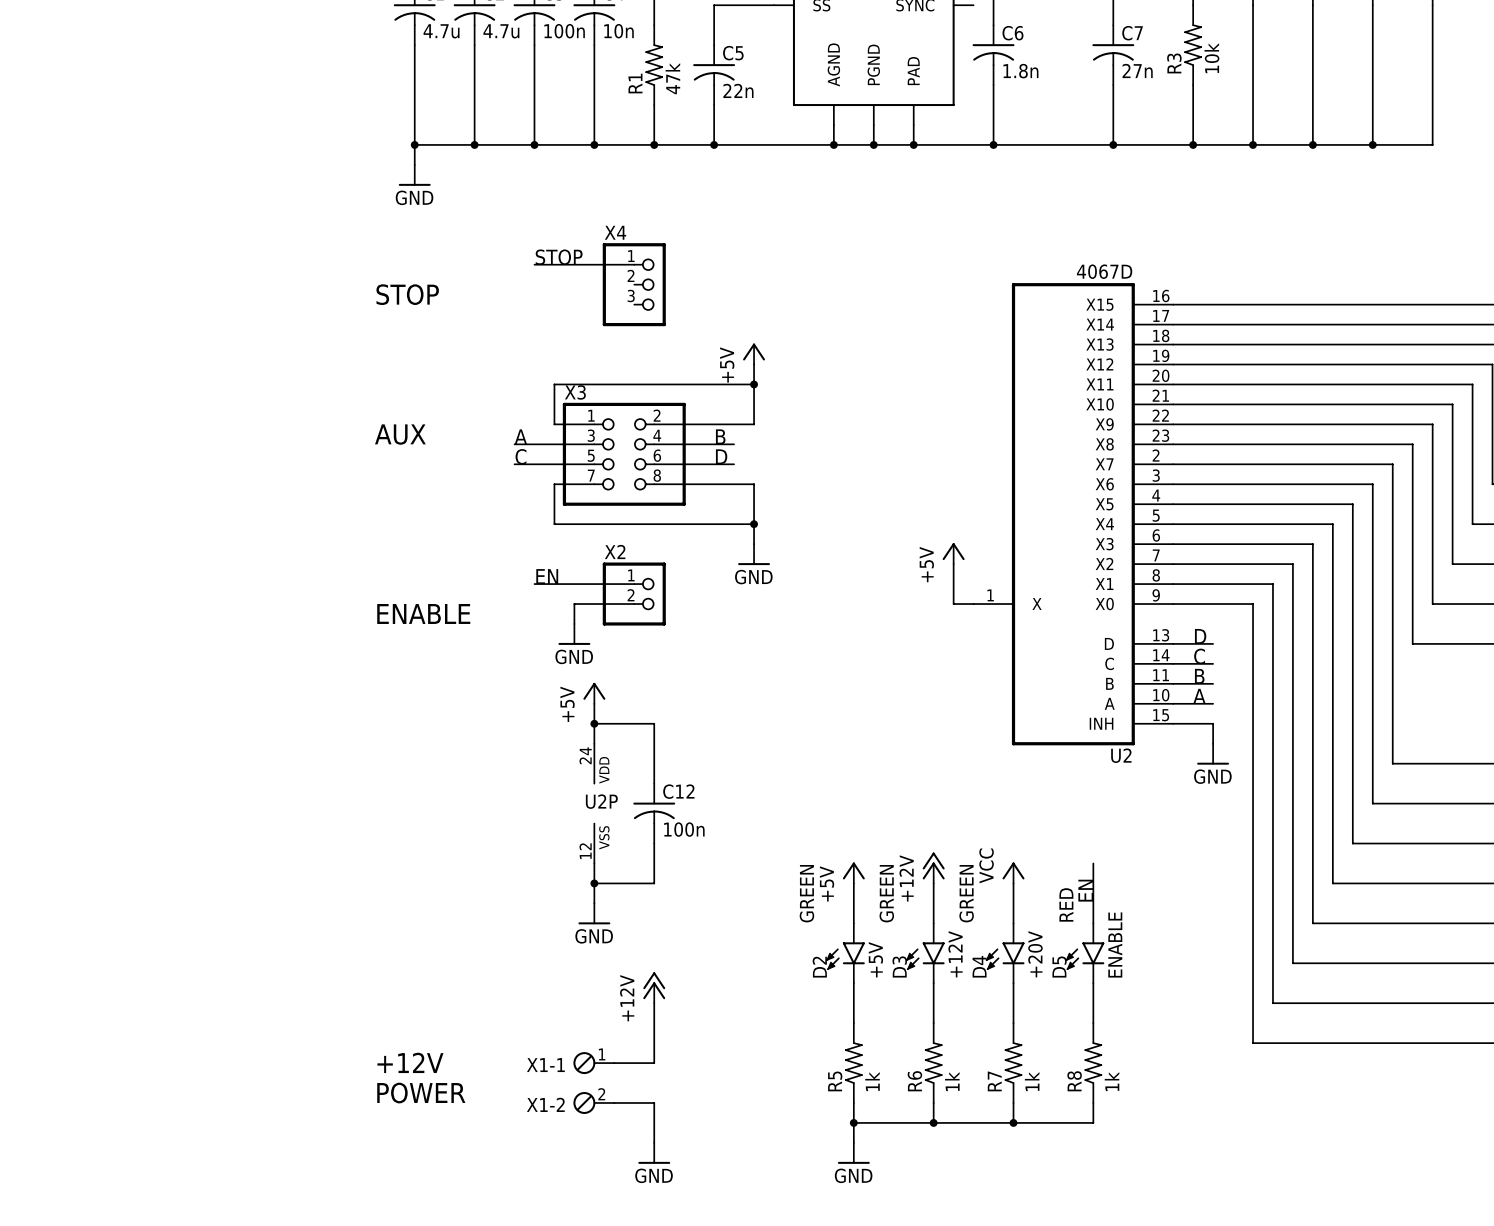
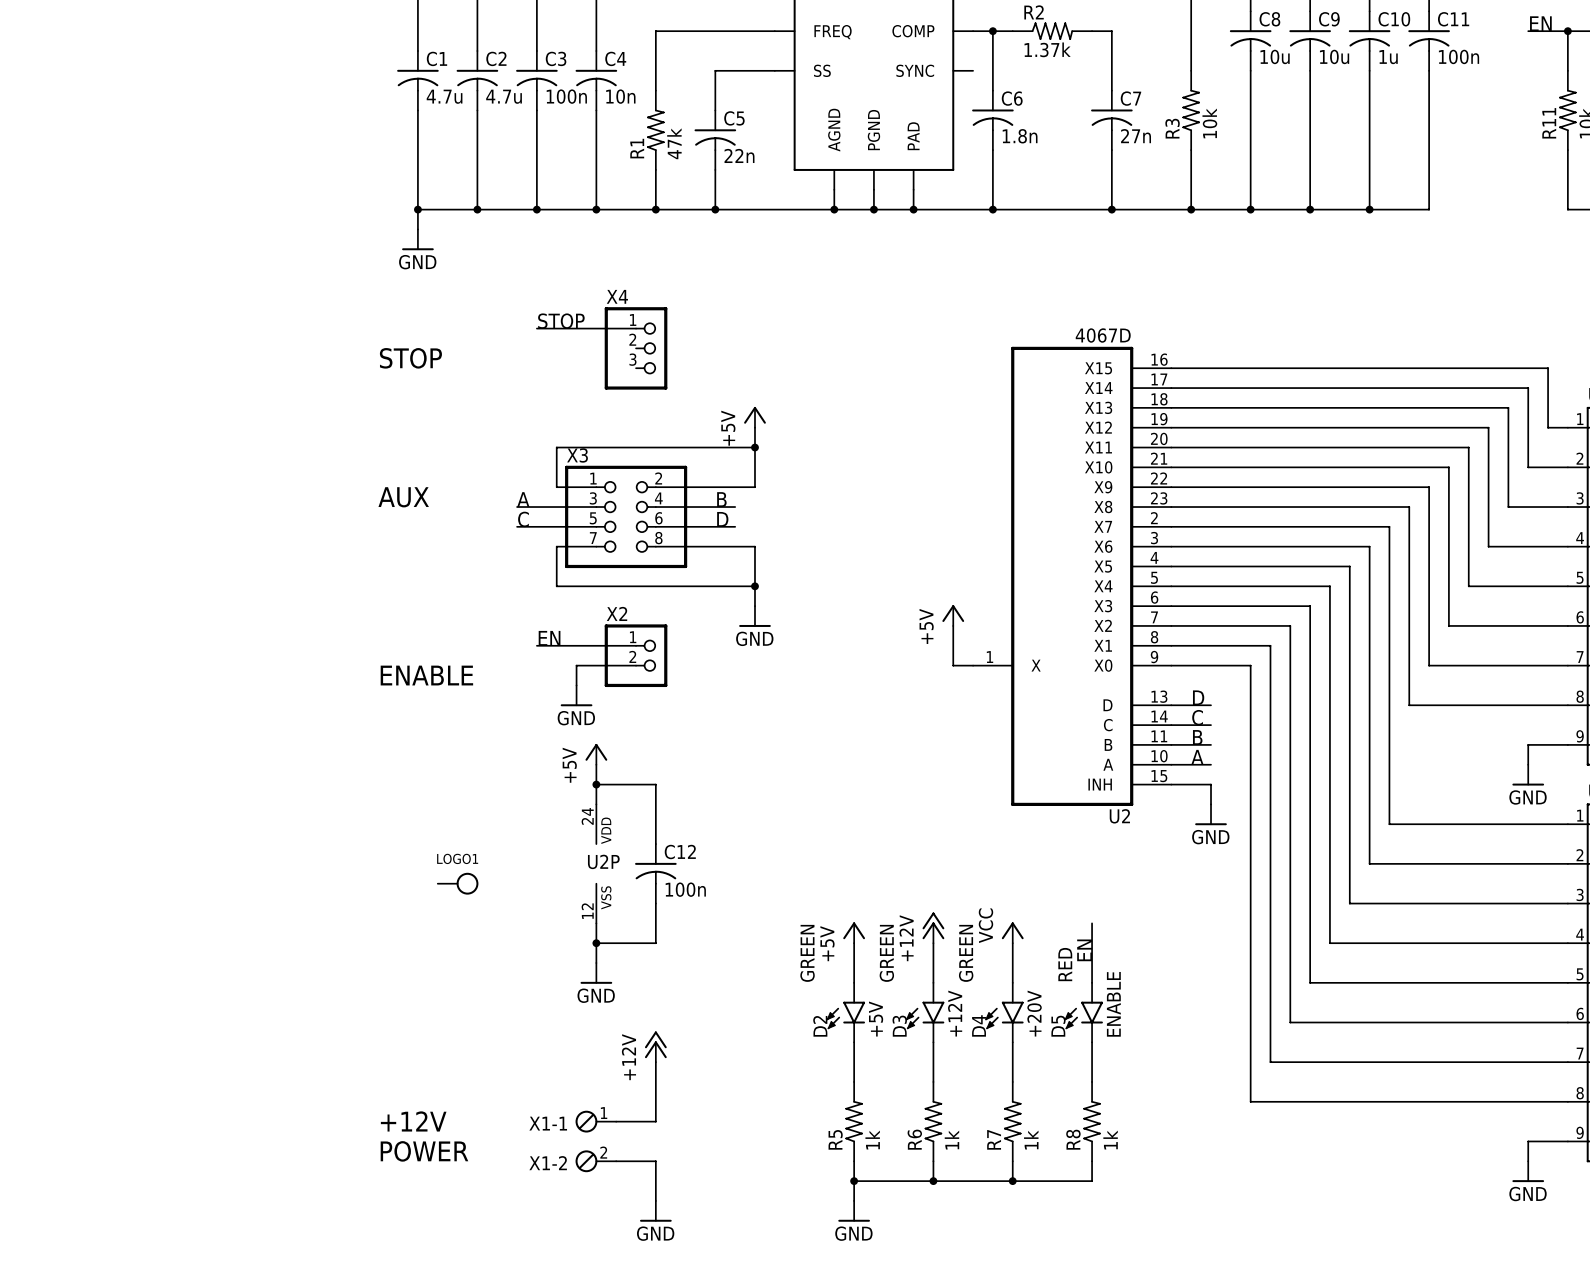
LOGO1: none -> (458, 883)

